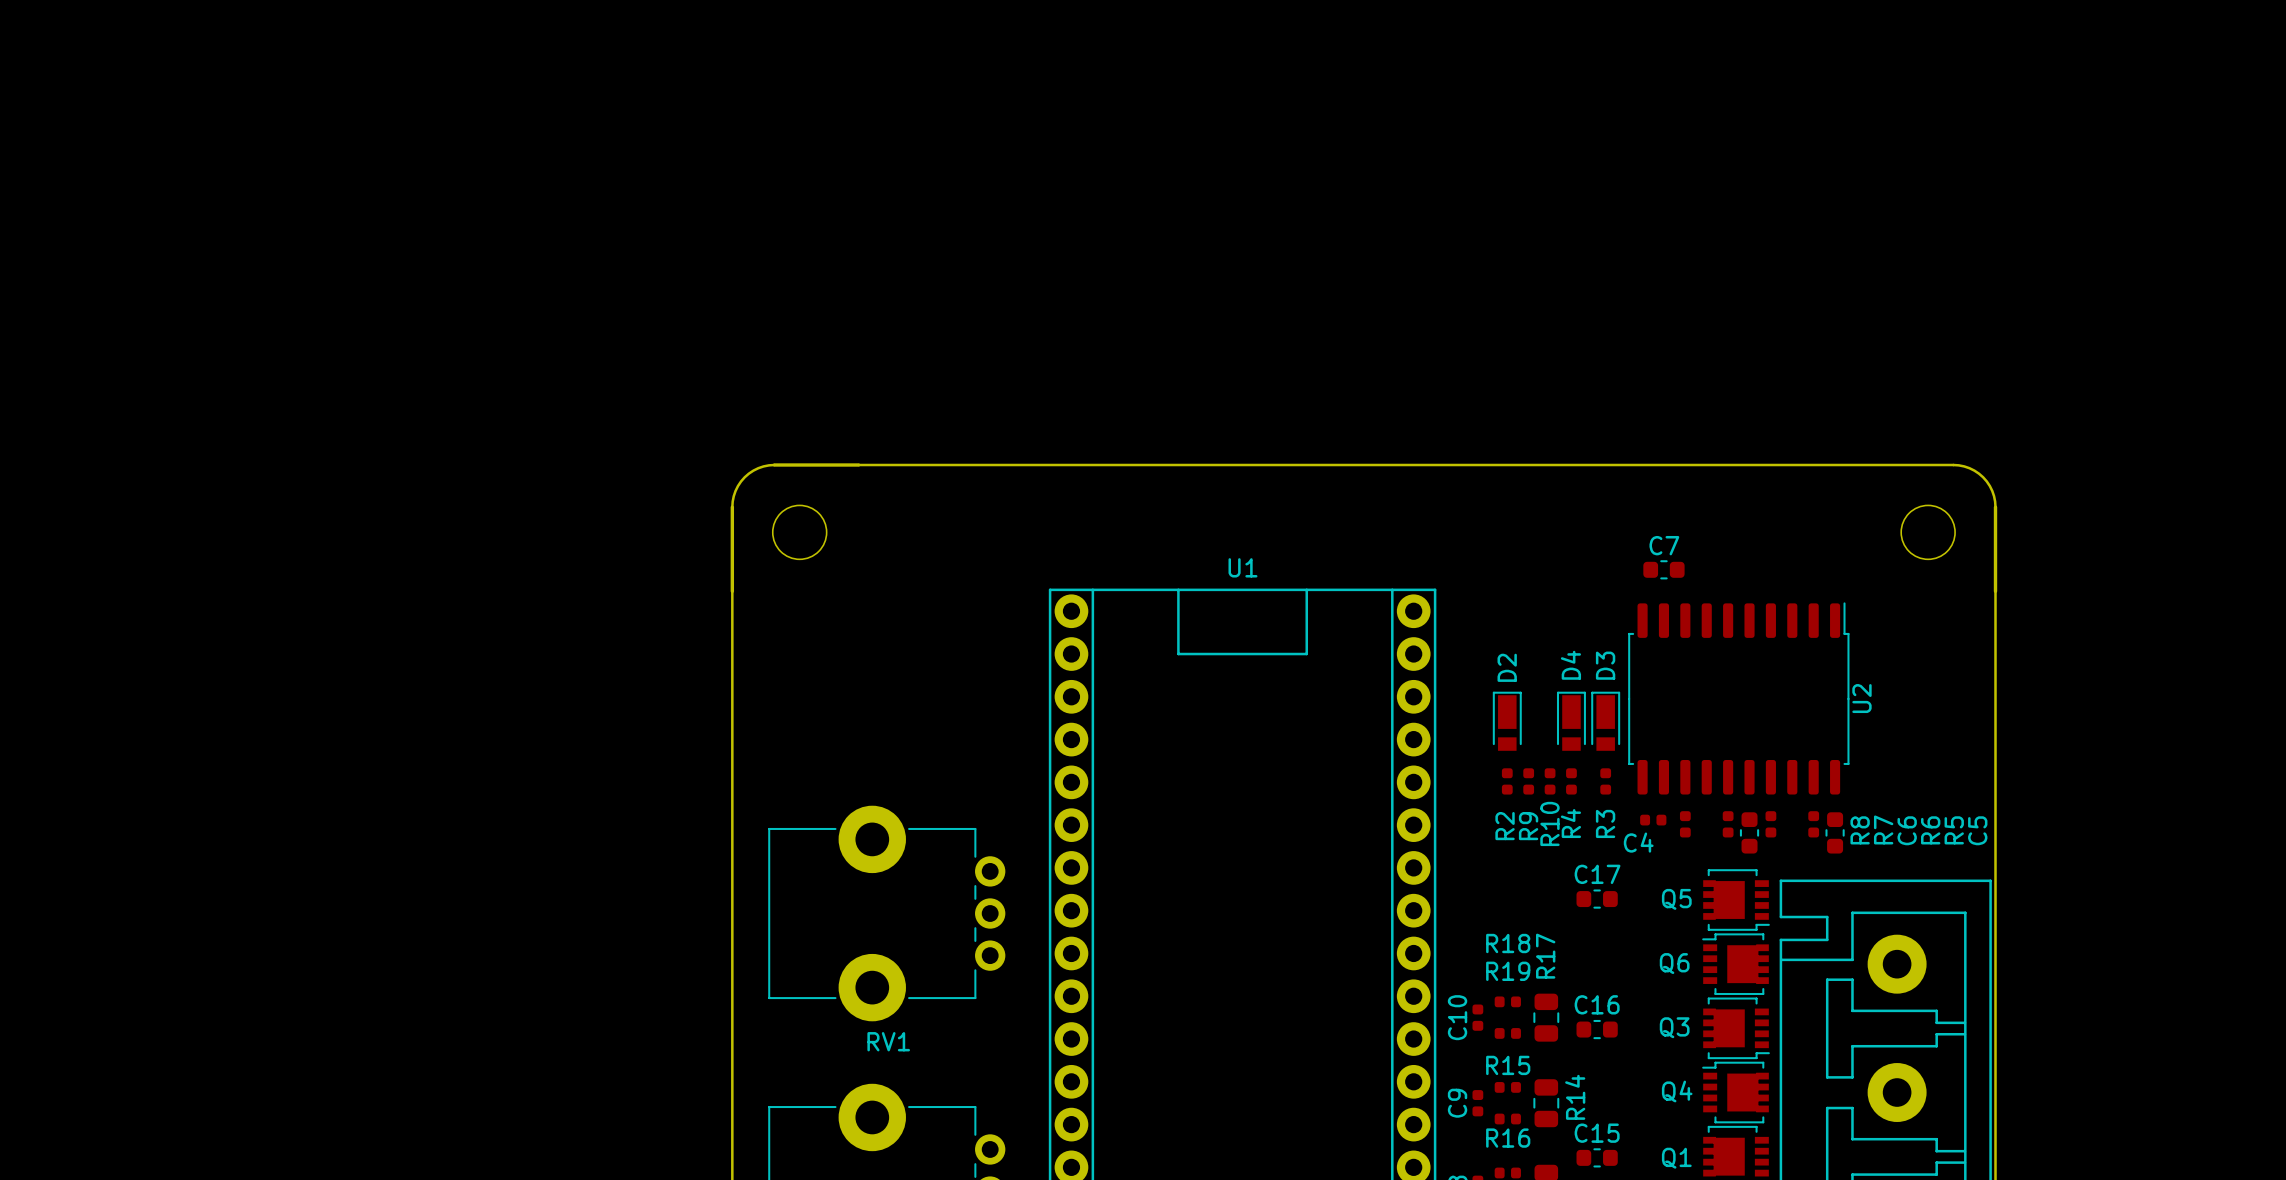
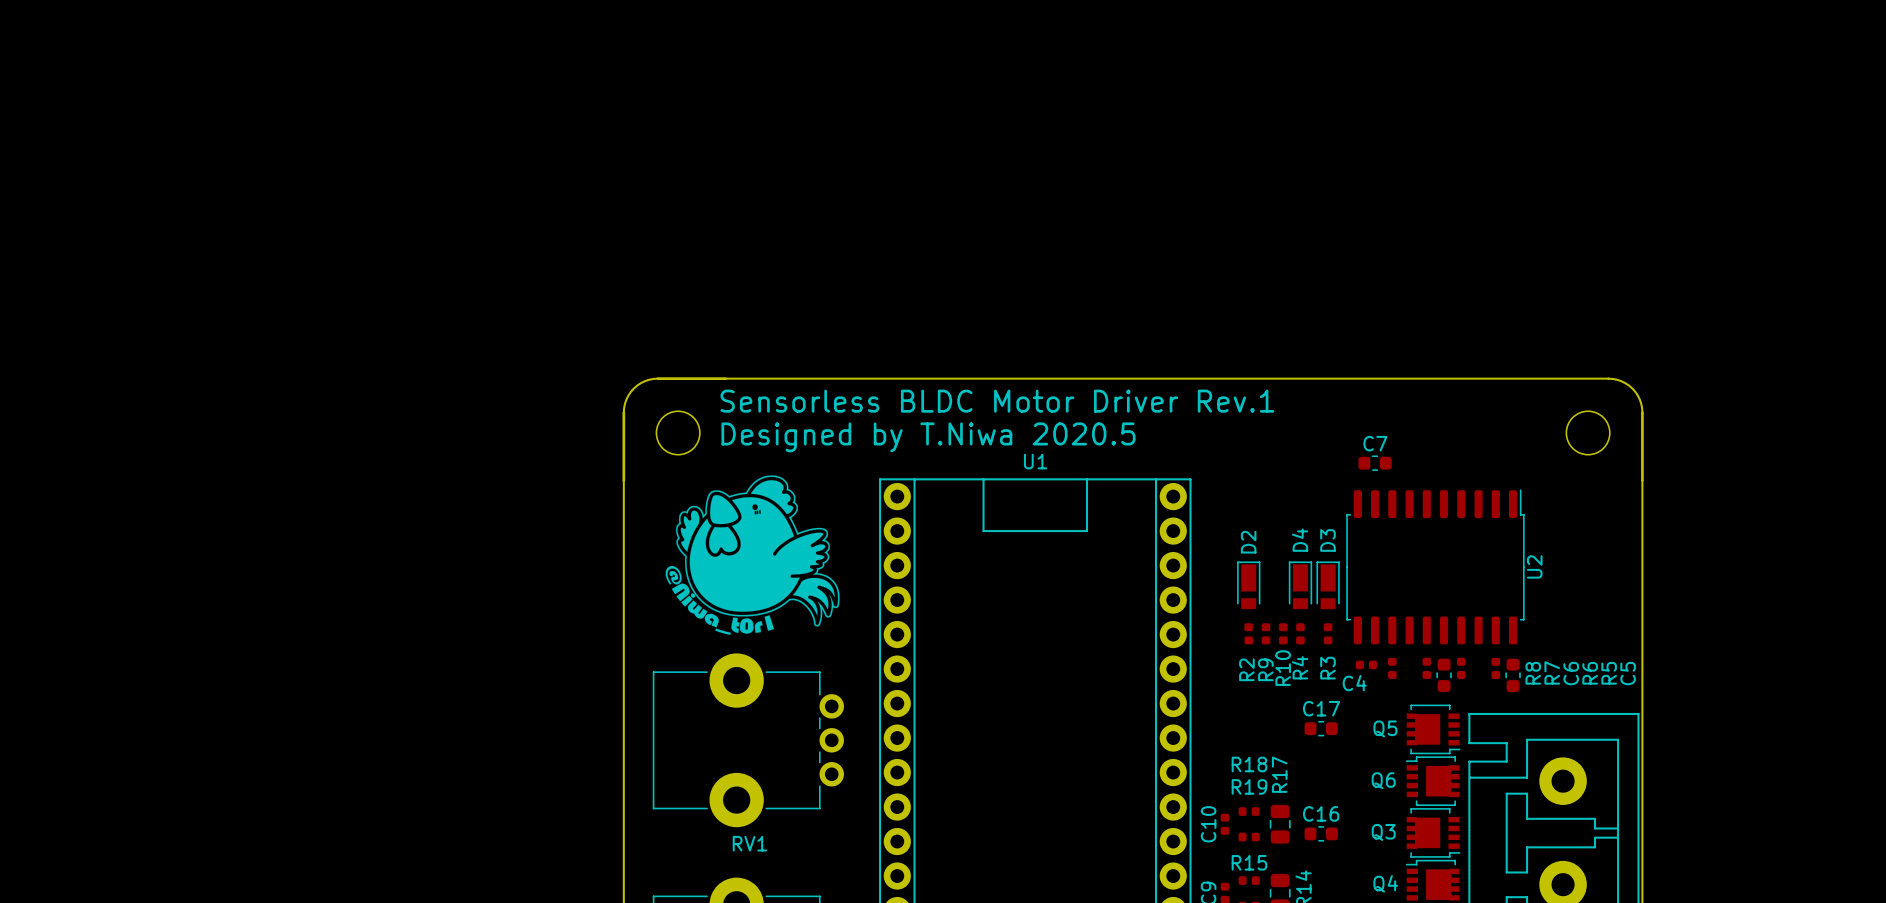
text: none -> Sensorless BLDC Motor Driver Rev.1 (997, 401)
text: none -> Designed by T.Niwa 2020.5 (928, 437)
drawing: none -> [665, 475, 840, 635]

